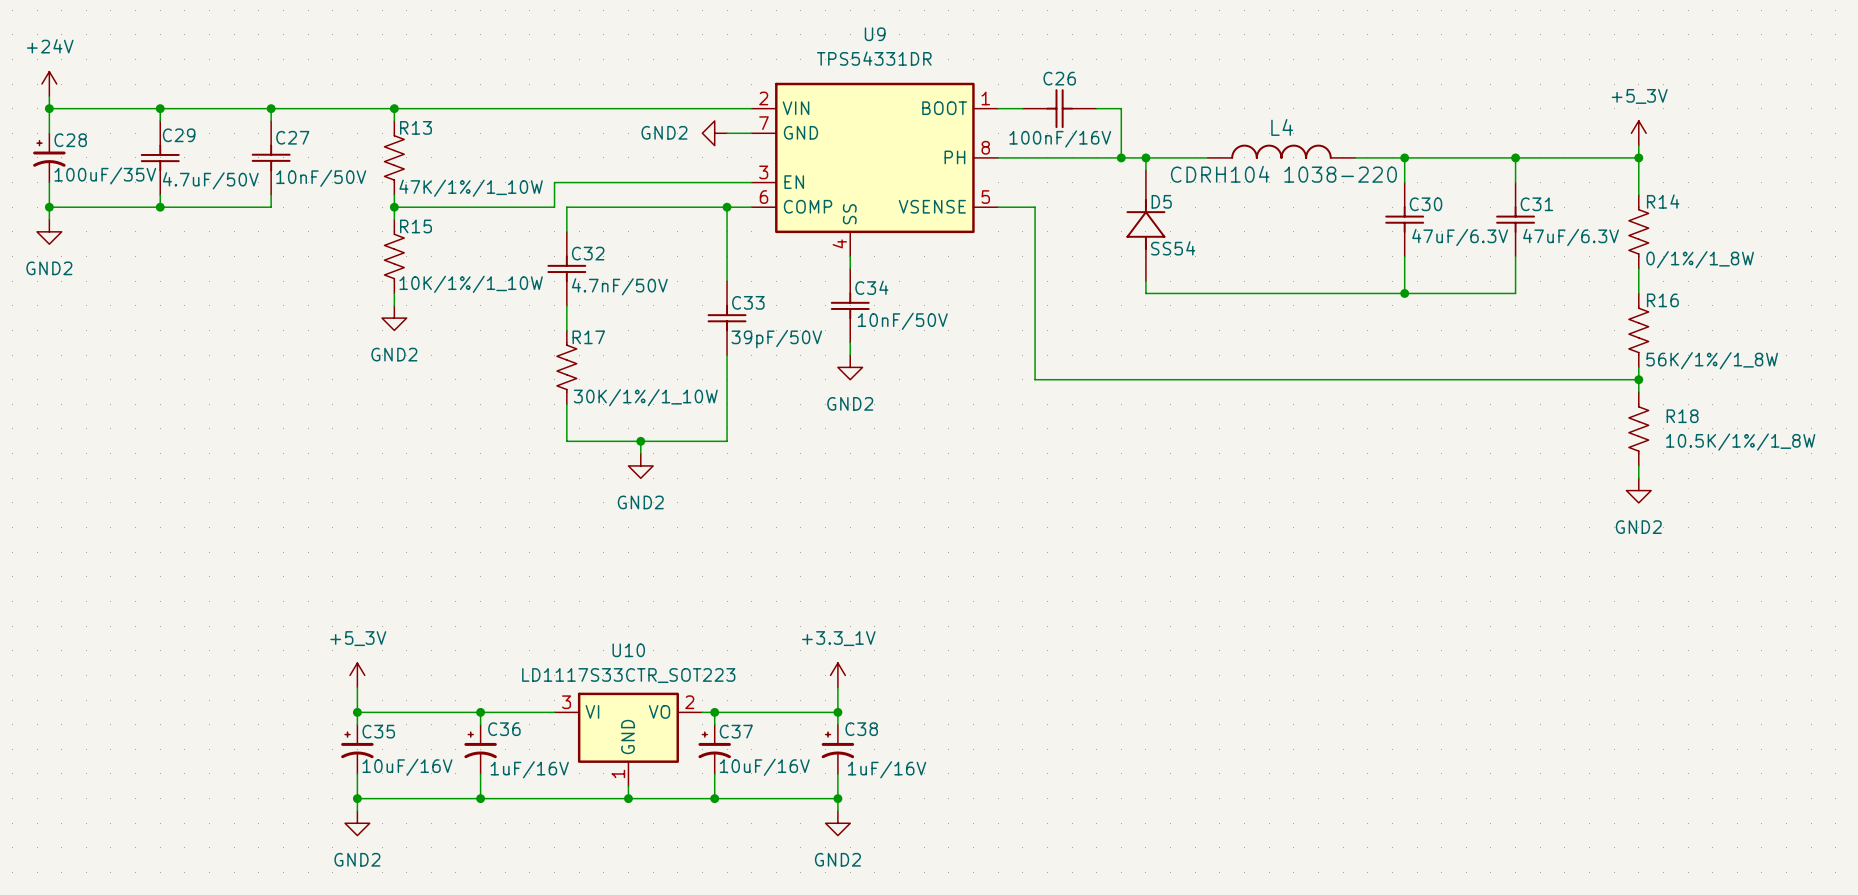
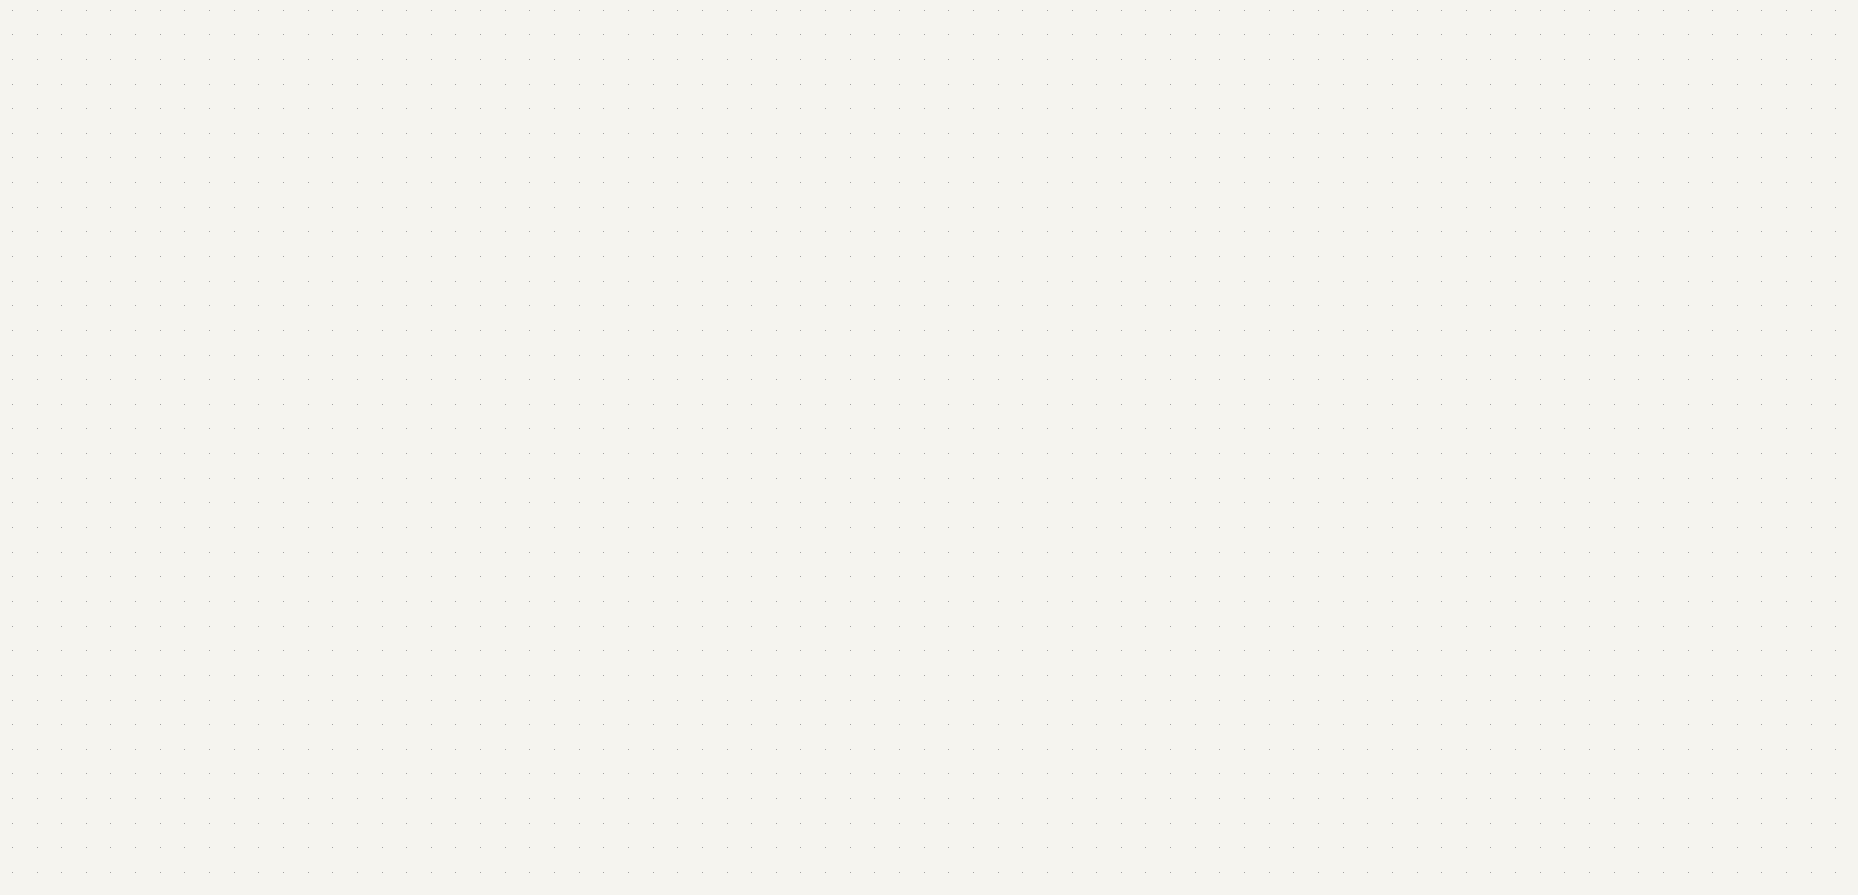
power symbol: +24V (49, 84) -> none
wire: (49, 96) (49, 133) -> none
wire: (49, 108) (751, 108) -> none
junction: (49, 108) -> none
wire: (160, 108) (160, 120) -> none
junction: (160, 108) -> none
wire: (271, 108) (271, 120) -> none
junction: (271, 108) -> none
wire: (394, 108) (394, 120) -> none
junction: (394, 108) -> none
wire: (998, 108) (1022, 108) -> none
C26: 100nF/16V (1059, 108) -> none
wire: (1096, 108) (1121, 108) (1121, 157) -> none
power symbol: GND2 (714, 133) -> none
wire: (727, 133) (751, 133) -> none
power symbol: +5_3V (1638, 133) -> none
wire: (1638, 145) (1638, 194) -> none
L4: CDRH104 1038-220 (1281, 151) -> none
C28: 100uF/35V (49, 157) -> none
C29: 4.7uF/50V (160, 157) -> none
C27: 10nF/50V (271, 157) -> none
R13: 47K/1%/1_10W (394, 157) -> none
wire: (998, 157) (1207, 157) -> none
junction: (1121, 157) -> none
wire: (1145, 157) (1145, 170) -> none
junction: (1145, 157) -> none
wire: (1355, 157) (1638, 157) -> none
wire: (1404, 157) (1404, 182) -> none
junction: (1404, 157) -> none
wire: (1515, 157) (1515, 182) -> none
junction: (1515, 157) -> none
junction: (1638, 157) -> none
U9: TPS54331DR (874, 169) -> none
wire: (49, 182) (49, 219) -> none
wire: (751, 182) (554, 182) (554, 207) (394, 207) -> none
wire: (160, 194) (160, 207) -> none
wire: (271, 194) (271, 207) (49, 207) -> none
wire: (394, 194) (394, 219) -> none
junction: (49, 207) -> none
junction: (160, 207) -> none
junction: (394, 207) -> none
wire: (727, 207) (727, 281) -> none
junction: (727, 207) -> none
wire: (751, 207) (566, 207) (566, 231) -> none
wire: (998, 207) (1035, 207) (1035, 379) (1638, 379) -> none
C30: 47uF/6.3V (1404, 219) -> none
C31: 47uF/6.3V (1515, 219) -> none
D5: SS54 (1145, 225) -> none
power symbol: GND2 (49, 231) -> none
R14: 0/1%/1_8W (1638, 231) -> none
R15: 10K/1%/1_10W (394, 256) -> none
wire: (850, 256) (850, 268) -> none
wire: (1404, 256) (1404, 293) -> none
wire: (1515, 256) (1515, 293) (1145, 293) (1145, 281) -> none
C32: 4.7nF/50V (566, 268) -> none
wire: (1638, 268) (1638, 293) -> none
wire: (394, 293) (394, 305) -> none
junction: (1404, 293) -> none
wire: (566, 305) (566, 330) -> none
C34: 10nF/50V (850, 305) -> none
power symbol: GND2 (394, 318) -> none
C33: 39pF/50V (727, 318) -> none
R16: 56K/1%/1_8W (1638, 330) -> none
wire: (850, 342) (850, 355) -> none
wire: (727, 355) (727, 441) (566, 441) (566, 404) -> none
R17: 30K/1%/1_10W (566, 367) -> none
power symbol: GND2 (850, 367) -> none
wire: (1638, 367) (1638, 392) -> none
junction: (1638, 379) -> none
R18: 10.5K/1%/1_8W (1638, 428) -> none
wire: (640, 441) (640, 453) -> none
junction: (640, 441) -> none
power symbol: GND2 (640, 465) -> none
wire: (1638, 465) (1638, 478) -> none
power symbol: GND2 (1638, 490) -> none
power symbol: +5_3V (357, 675) -> none
power symbol: +3.3_1V (837, 675) -> none
wire: (357, 687) (357, 724) -> none
wire: (837, 687) (837, 724) -> none
wire: (357, 712) (554, 712) -> none
junction: (357, 712) -> none
wire: (480, 712) (480, 724) -> none
junction: (480, 712) -> none
wire: (702, 712) (837, 712) -> none
wire: (714, 712) (714, 724) -> none
junction: (714, 712) -> none
junction: (837, 712) -> none
U10: LD1117S33CTR_SOT223 (628, 739) -> none
C35: 10uF/16V (357, 749) -> none
C36: 1uF/16V (480, 749) -> none
C37: 10uF/16V (714, 749) -> none
C38: 1uF/16V (837, 749) -> none
wire: (357, 773) (357, 810) -> none
wire: (480, 773) (480, 798) -> none
wire: (714, 773) (714, 798) -> none
wire: (837, 773) (837, 810) -> none
wire: (628, 786) (628, 798) -> none
wire: (357, 798) (837, 798) -> none
junction: (357, 798) -> none
junction: (480, 798) -> none
junction: (628, 798) -> none
junction: (714, 798) -> none
junction: (837, 798) -> none
power symbol: GND2 (357, 823) -> none
power symbol: GND2 (837, 823) -> none

